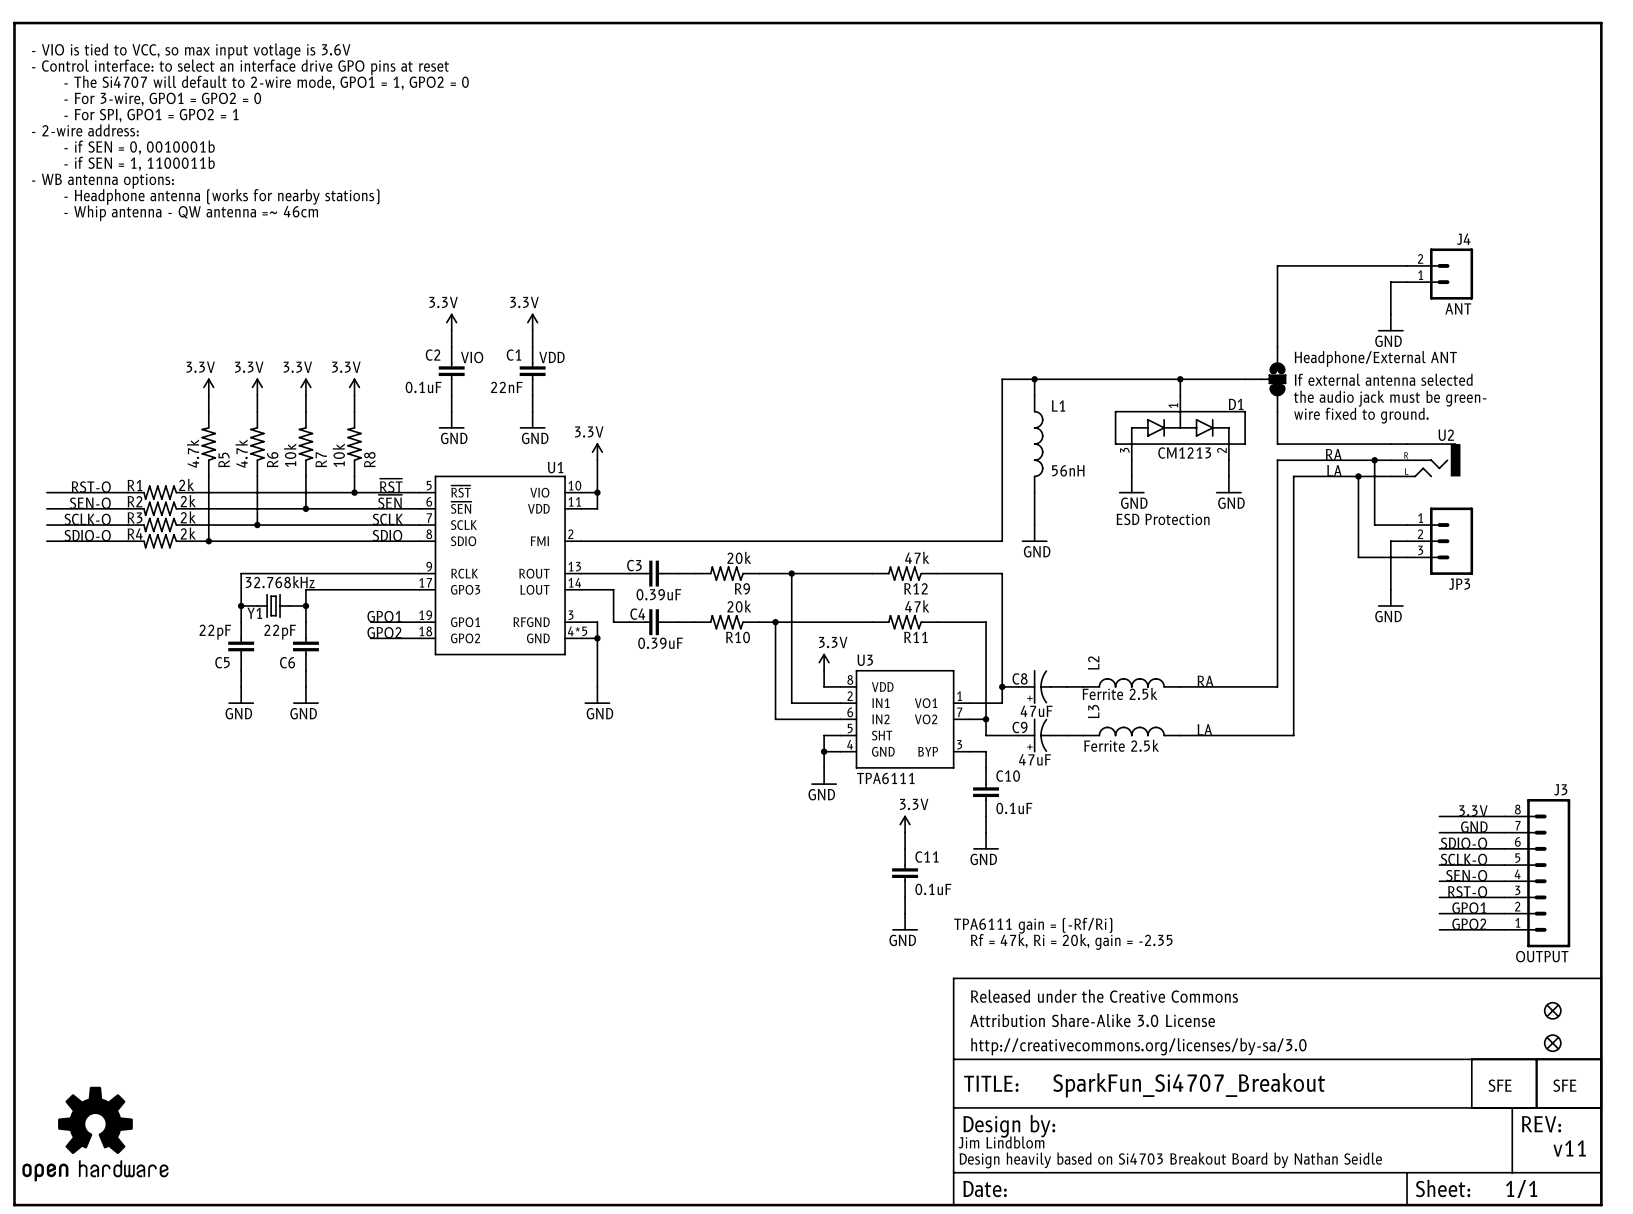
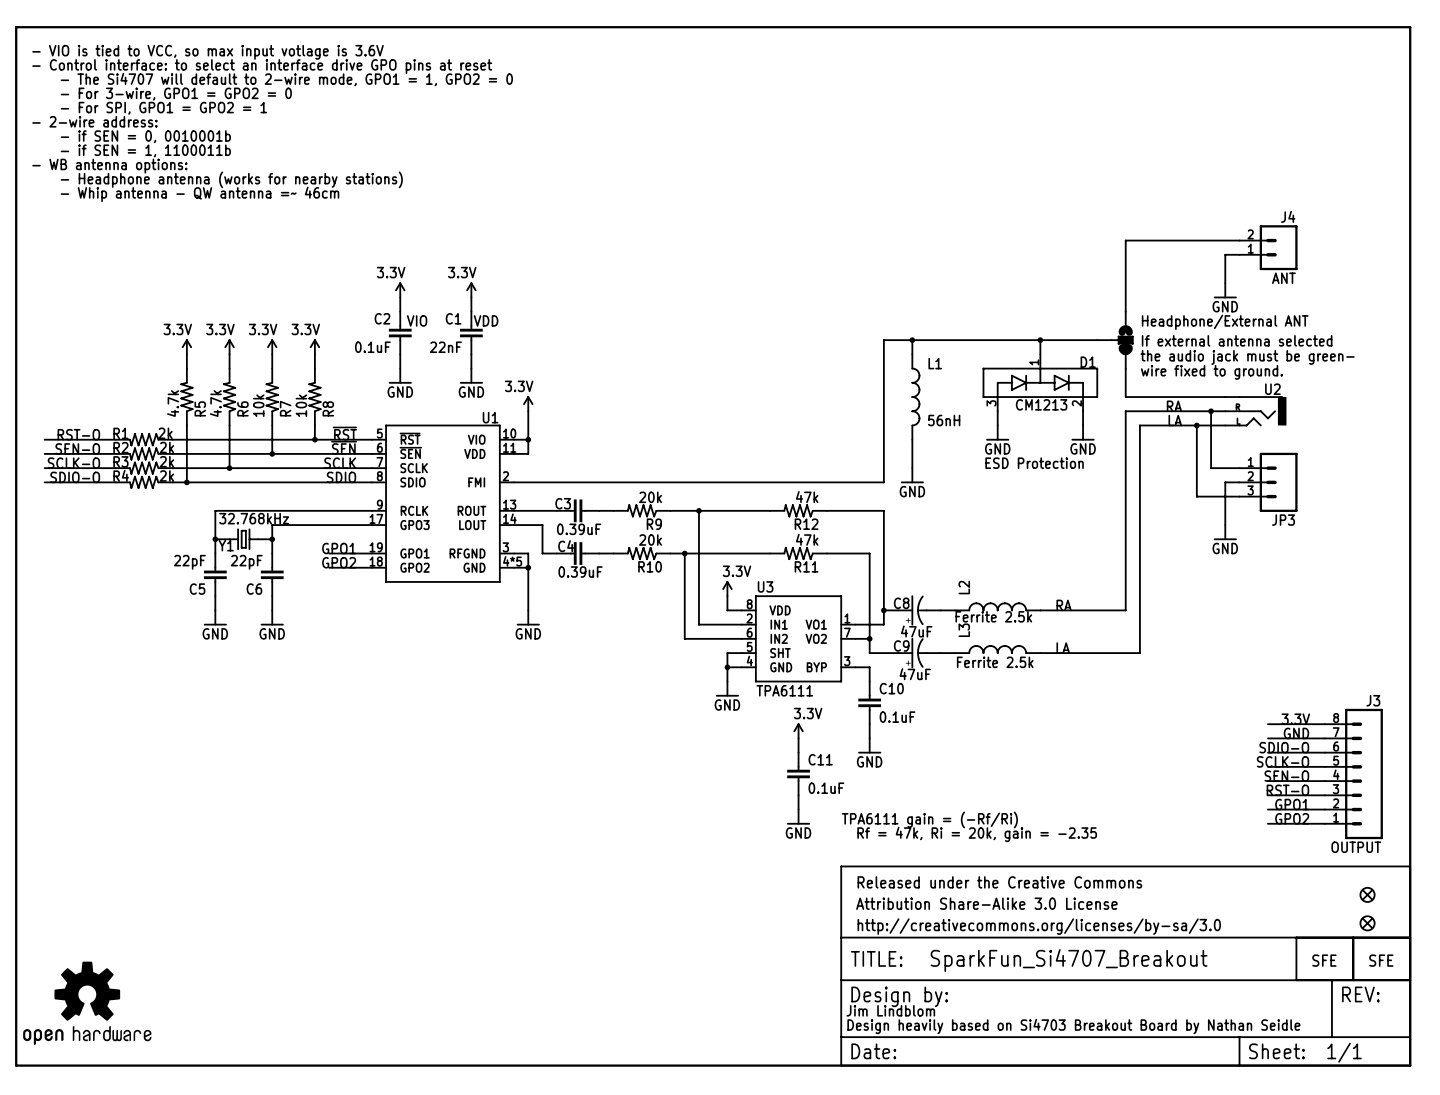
text: v11 (1569, 1148) -> none

